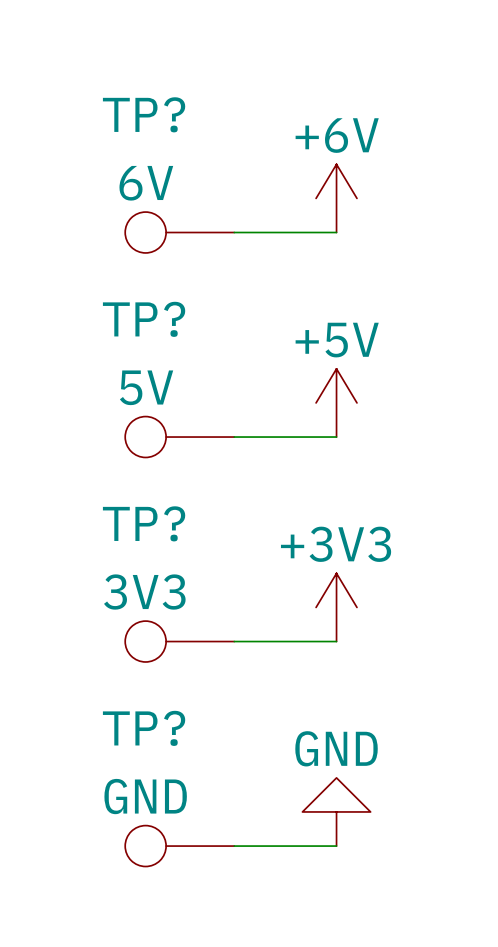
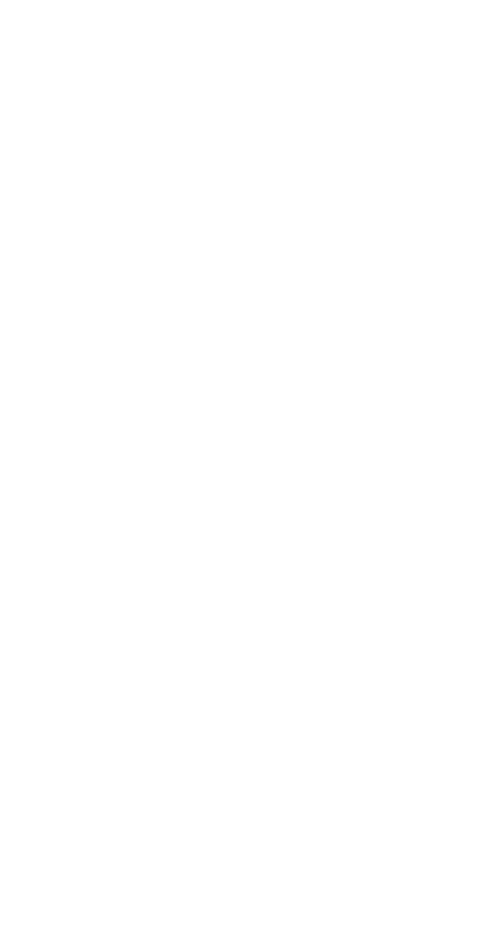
power symbol: +6V (336, 198) -> none
TP?: 6V (179, 232) -> none
wire: (234, 232) (336, 232) -> none
power symbol: +5V (336, 402) -> none
TP?: 5V (179, 437) -> none
wire: (234, 437) (336, 437) -> none
power symbol: +3V3 (336, 607) -> none
TP?: 3V3 (179, 641) -> none
wire: (234, 641) (336, 641) -> none
power symbol: GND (336, 811) -> none
TP?: GND (179, 846) -> none
wire: (234, 846) (336, 846) -> none

